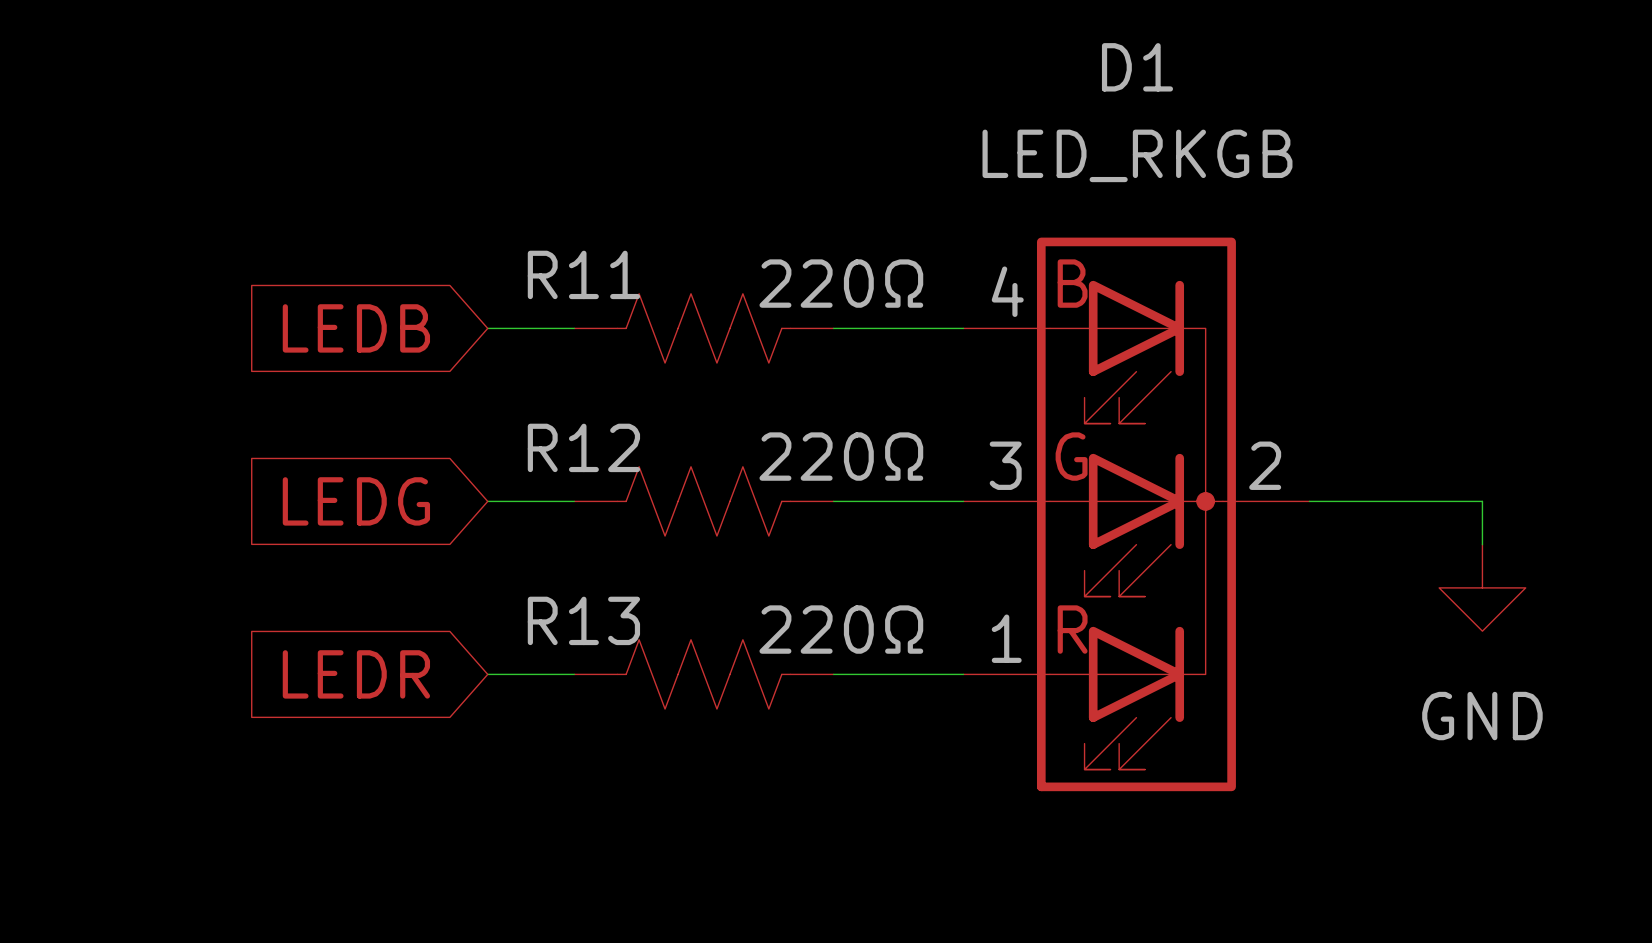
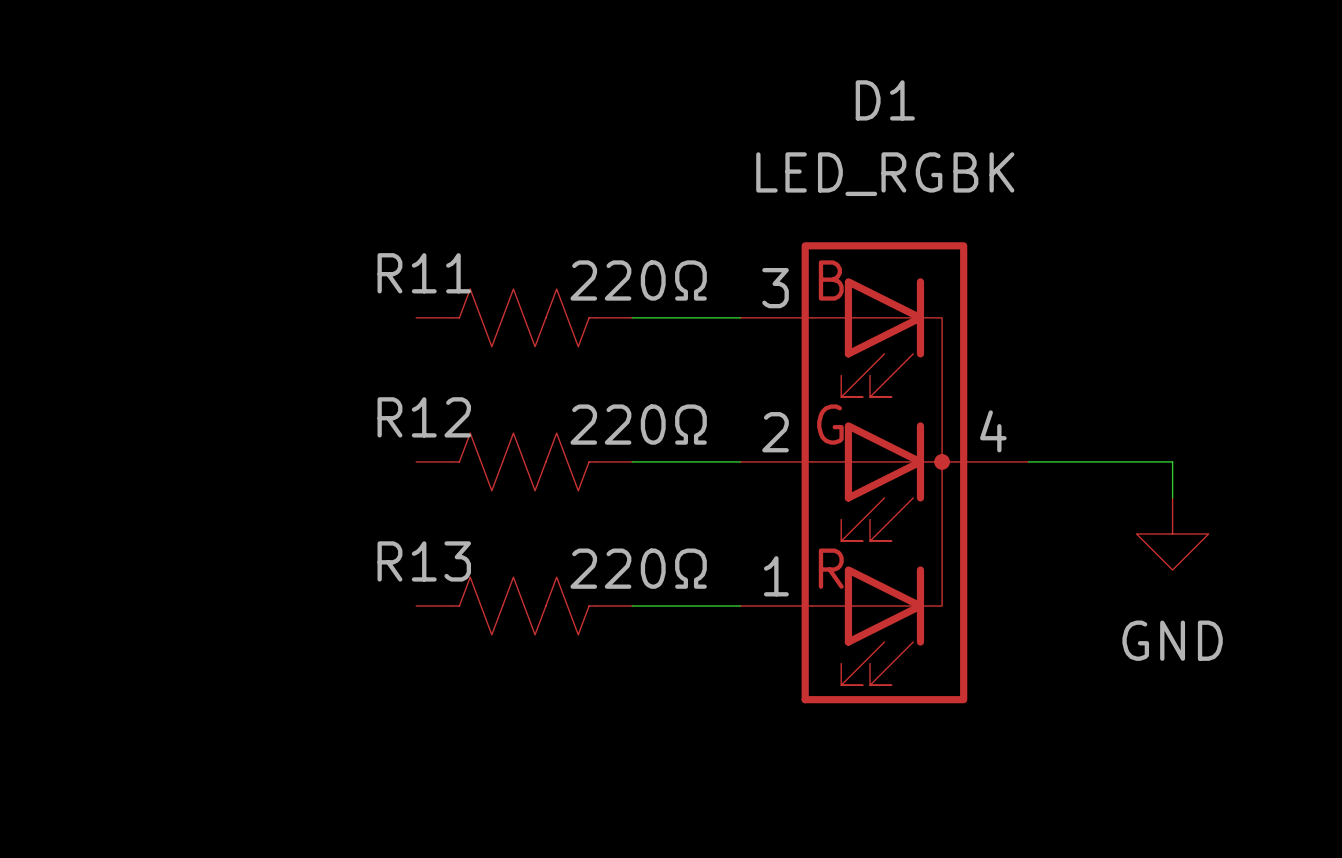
D1 value: LED_RKGB (1137, 155) -> LED_RGBK (885, 174)
D1 pin number: 4 (1007, 291) -> 3 (775, 288)
global label: LEDB (356, 328) -> none
wire: (487, 328) (574, 328) -> none
D1 pin number: 3 (1005, 465) -> 2 (775, 432)
D1 pin number: 2 (1265, 465) -> 4 (993, 431)
global label: LEDG (356, 501) -> none
wire: (487, 501) (574, 501) -> none
global label: LEDR (356, 674) -> none
wire: (487, 674) (574, 674) -> none

